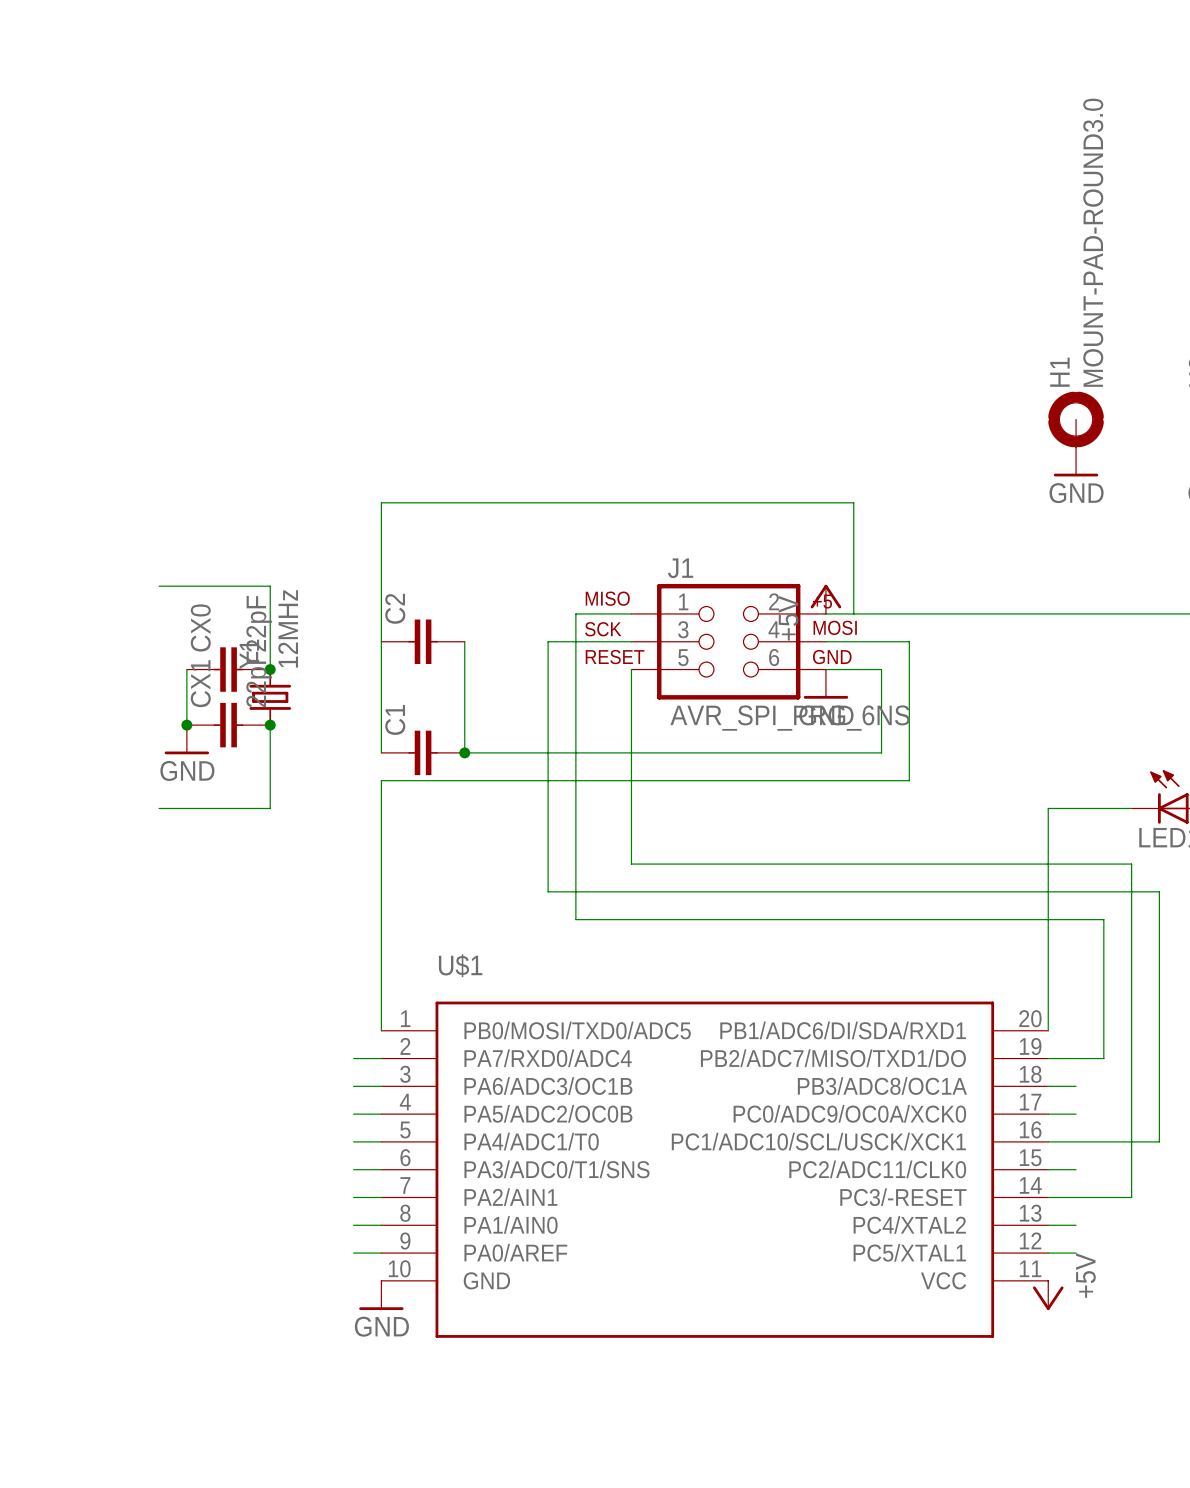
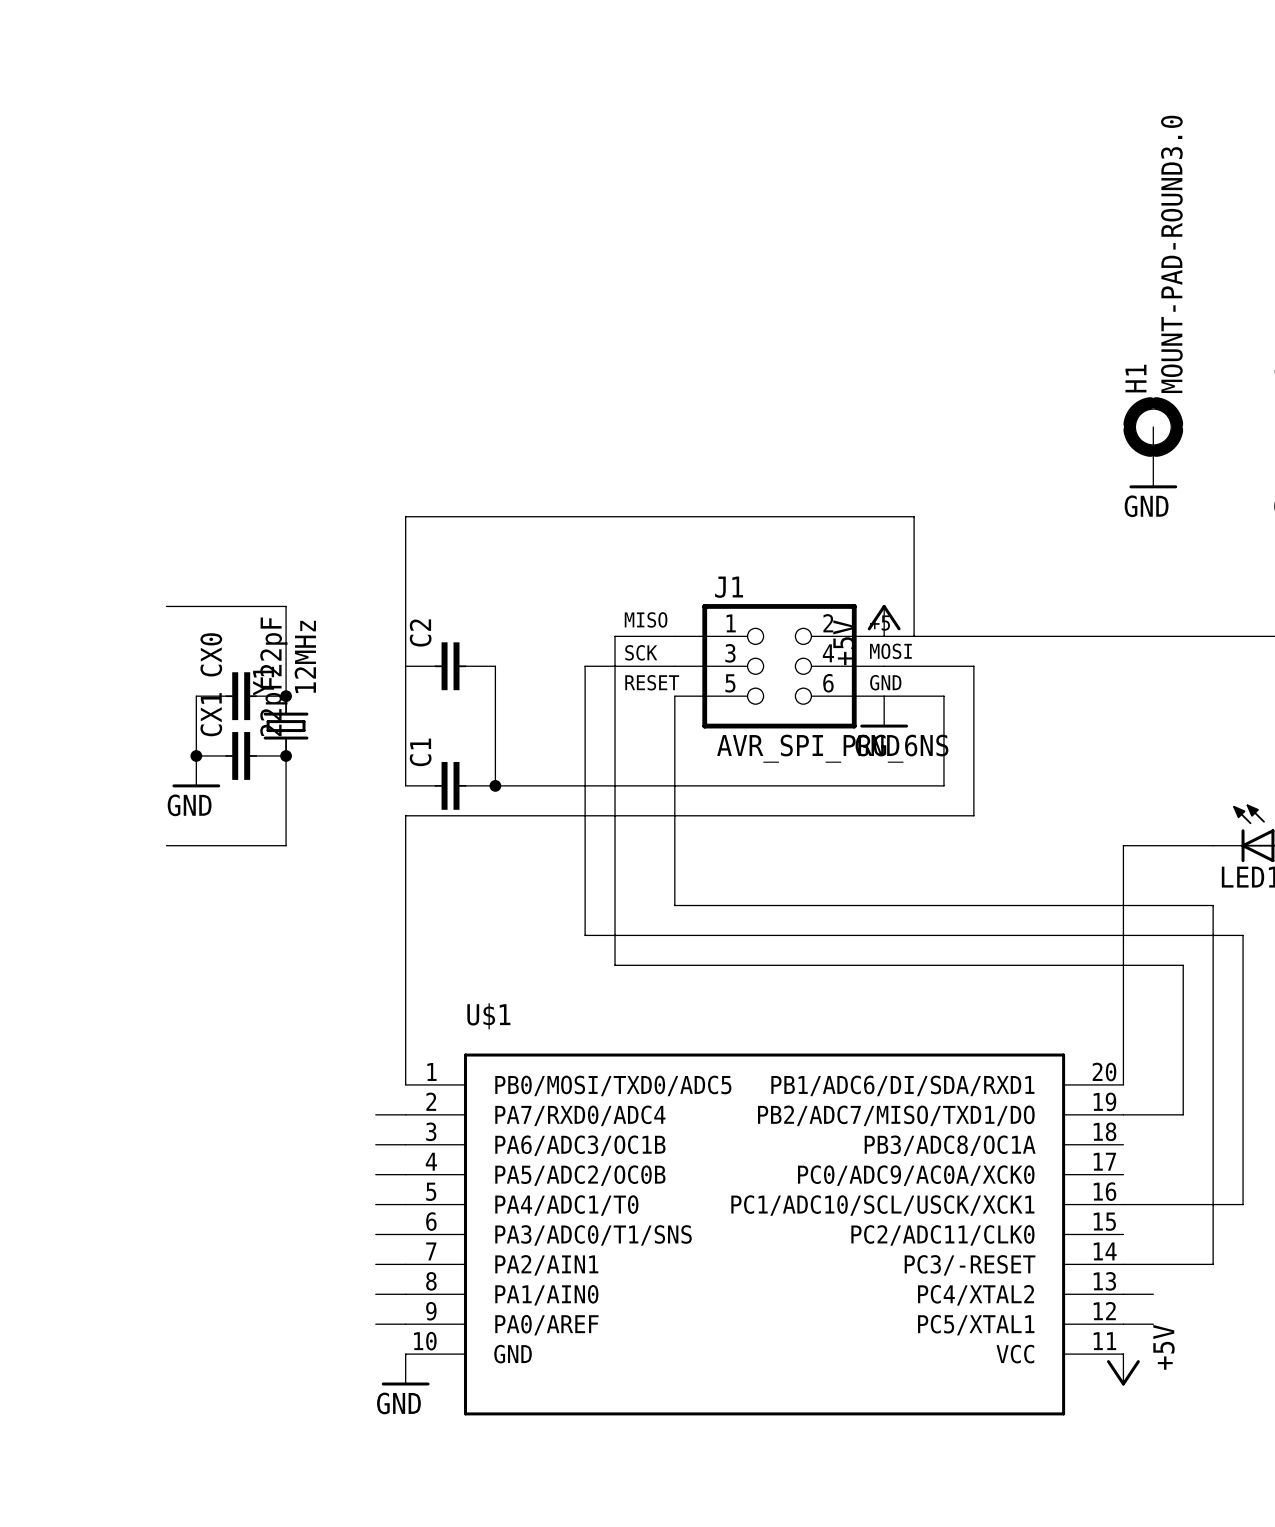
wire: (1048, 1086) (1076, 1086) -> none
U$1 pin name: PC0/ADC9/OC0A/XCK0 (849, 1113) -> PC0/ADC9/AC0A/XCK0 (916, 1175)
wire: (1048, 1114) (1076, 1114) -> none
wire: (1048, 1169) (1076, 1169) -> none

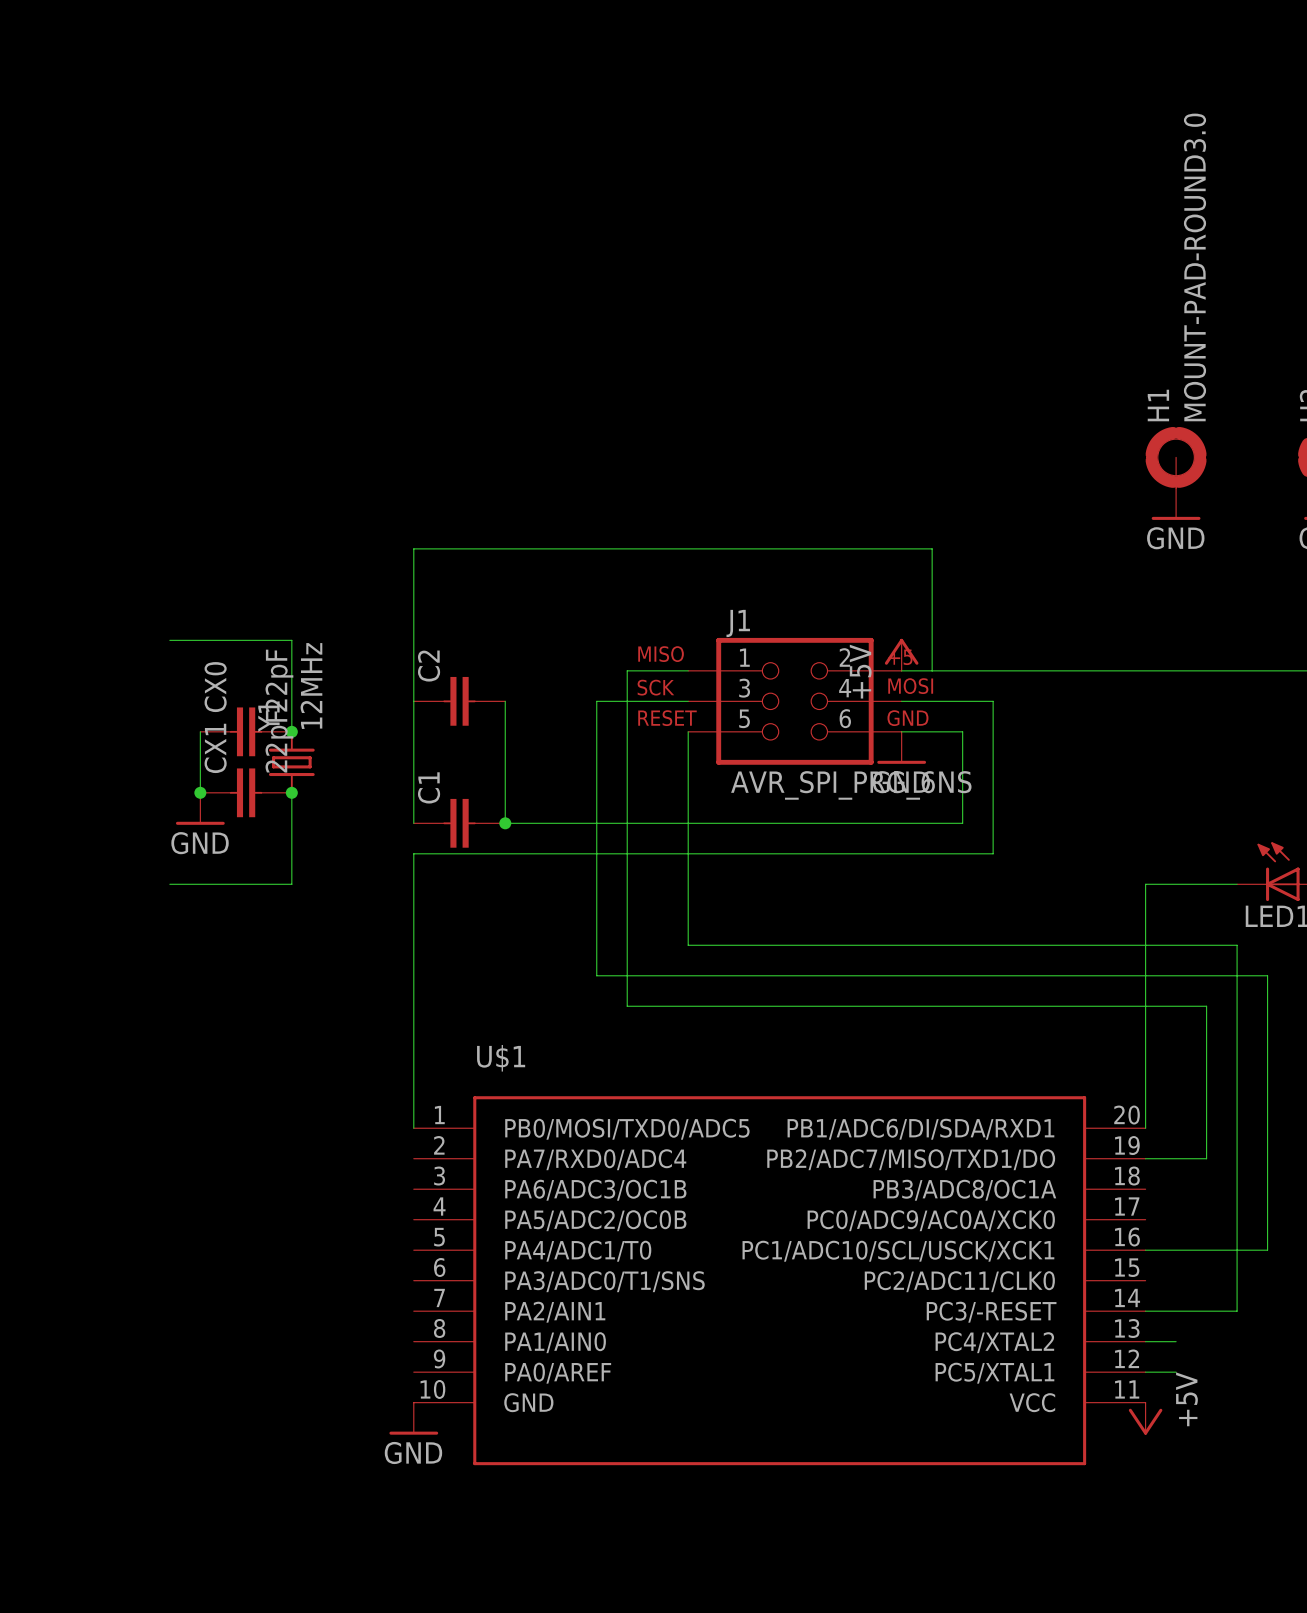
wire: (375, 1114) (405, 1114) -> none
wire: (375, 1144) (405, 1144) -> none
wire: (375, 1174) (405, 1174) -> none
wire: (375, 1204) (405, 1204) -> none
wire: (375, 1234) (405, 1234) -> none
wire: (375, 1264) (405, 1264) -> none
wire: (375, 1294) (405, 1294) -> none
wire: (375, 1324) (405, 1324) -> none

